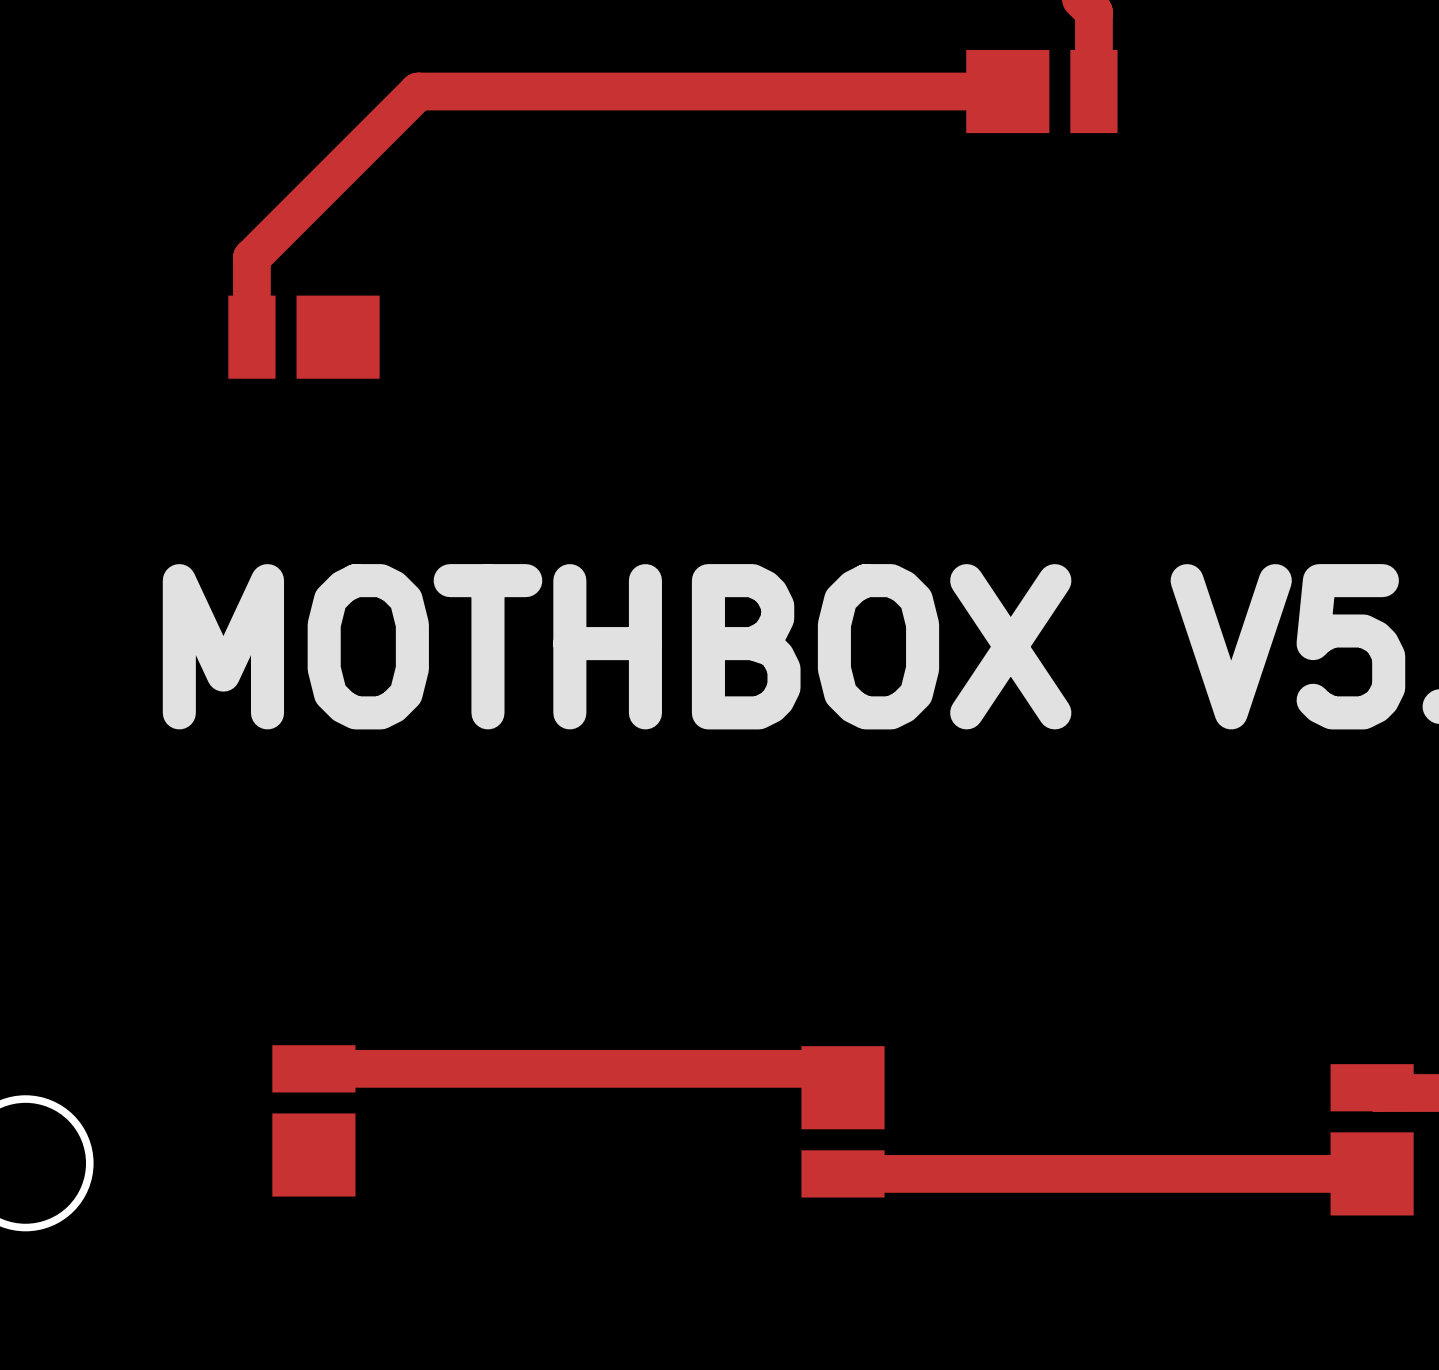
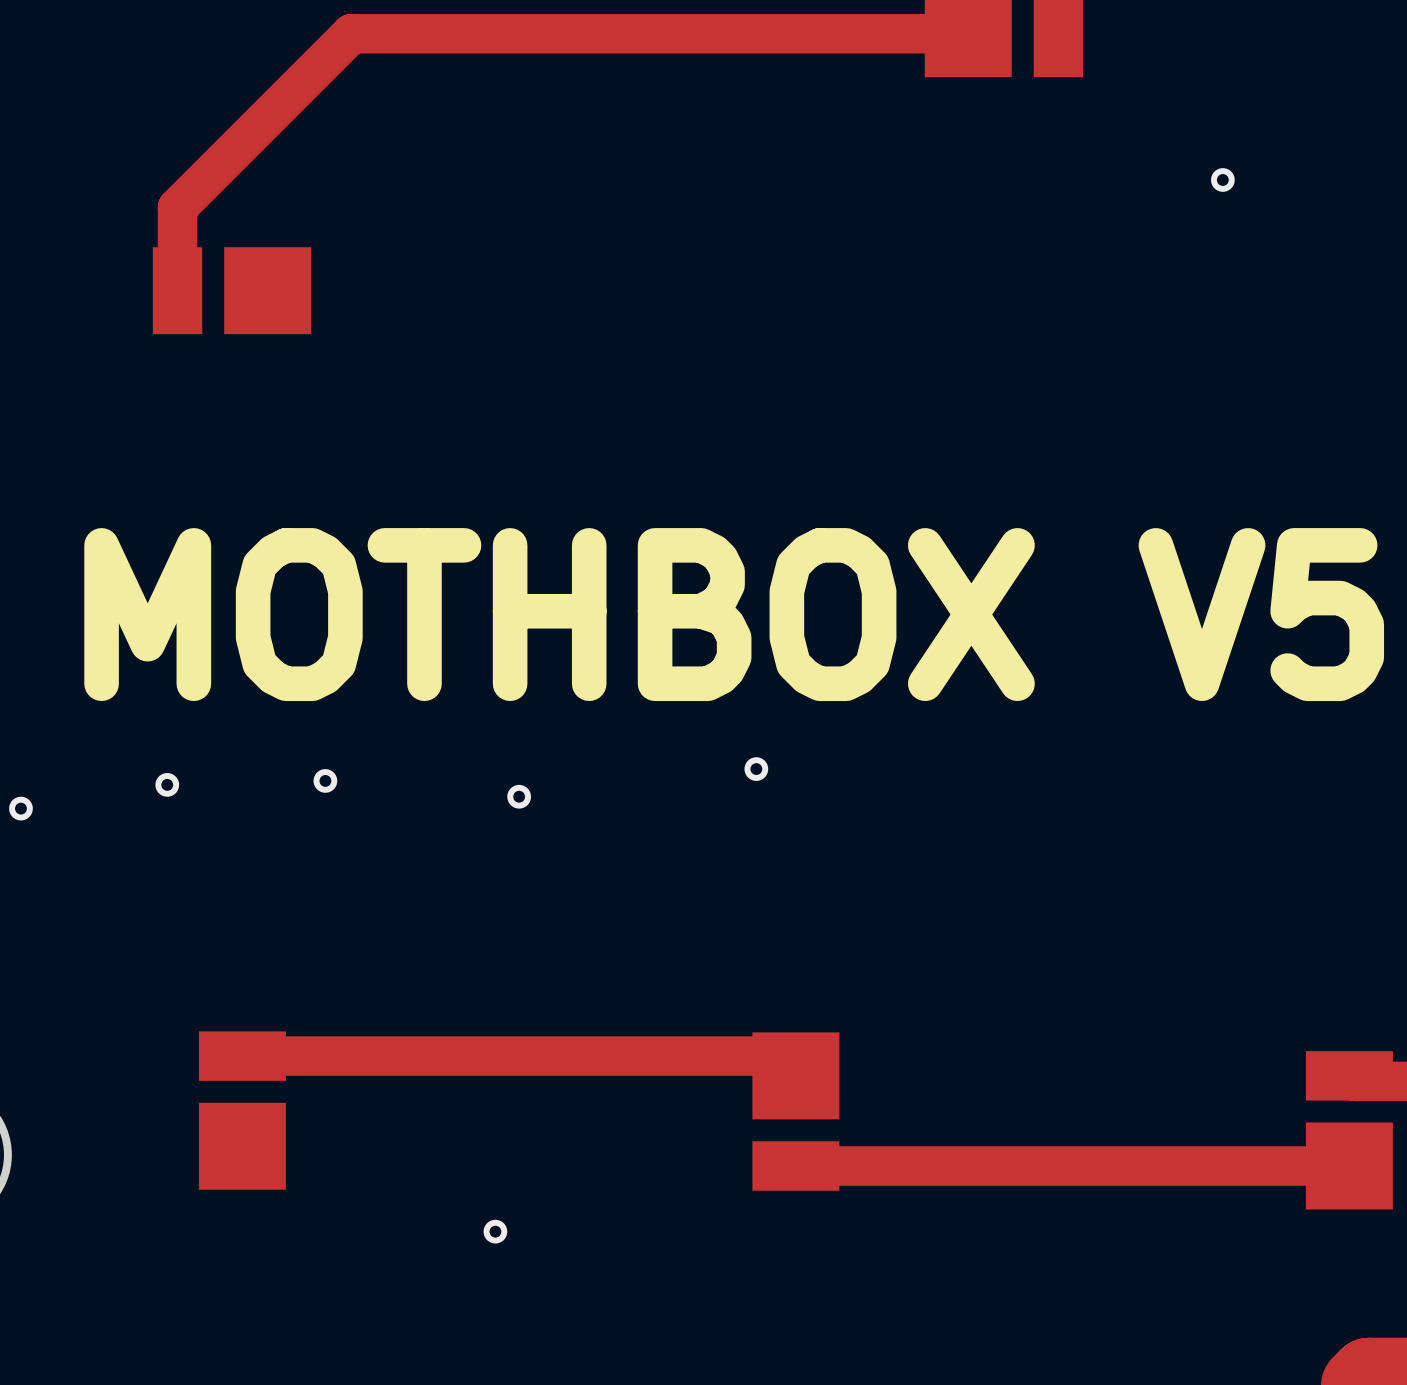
via: none -> (1222, 179)
via: none -> (756, 769)
via: none -> (325, 780)
via: none -> (167, 784)
via: none -> (519, 796)
via: none -> (20, 808)
via: none -> (495, 1231)

